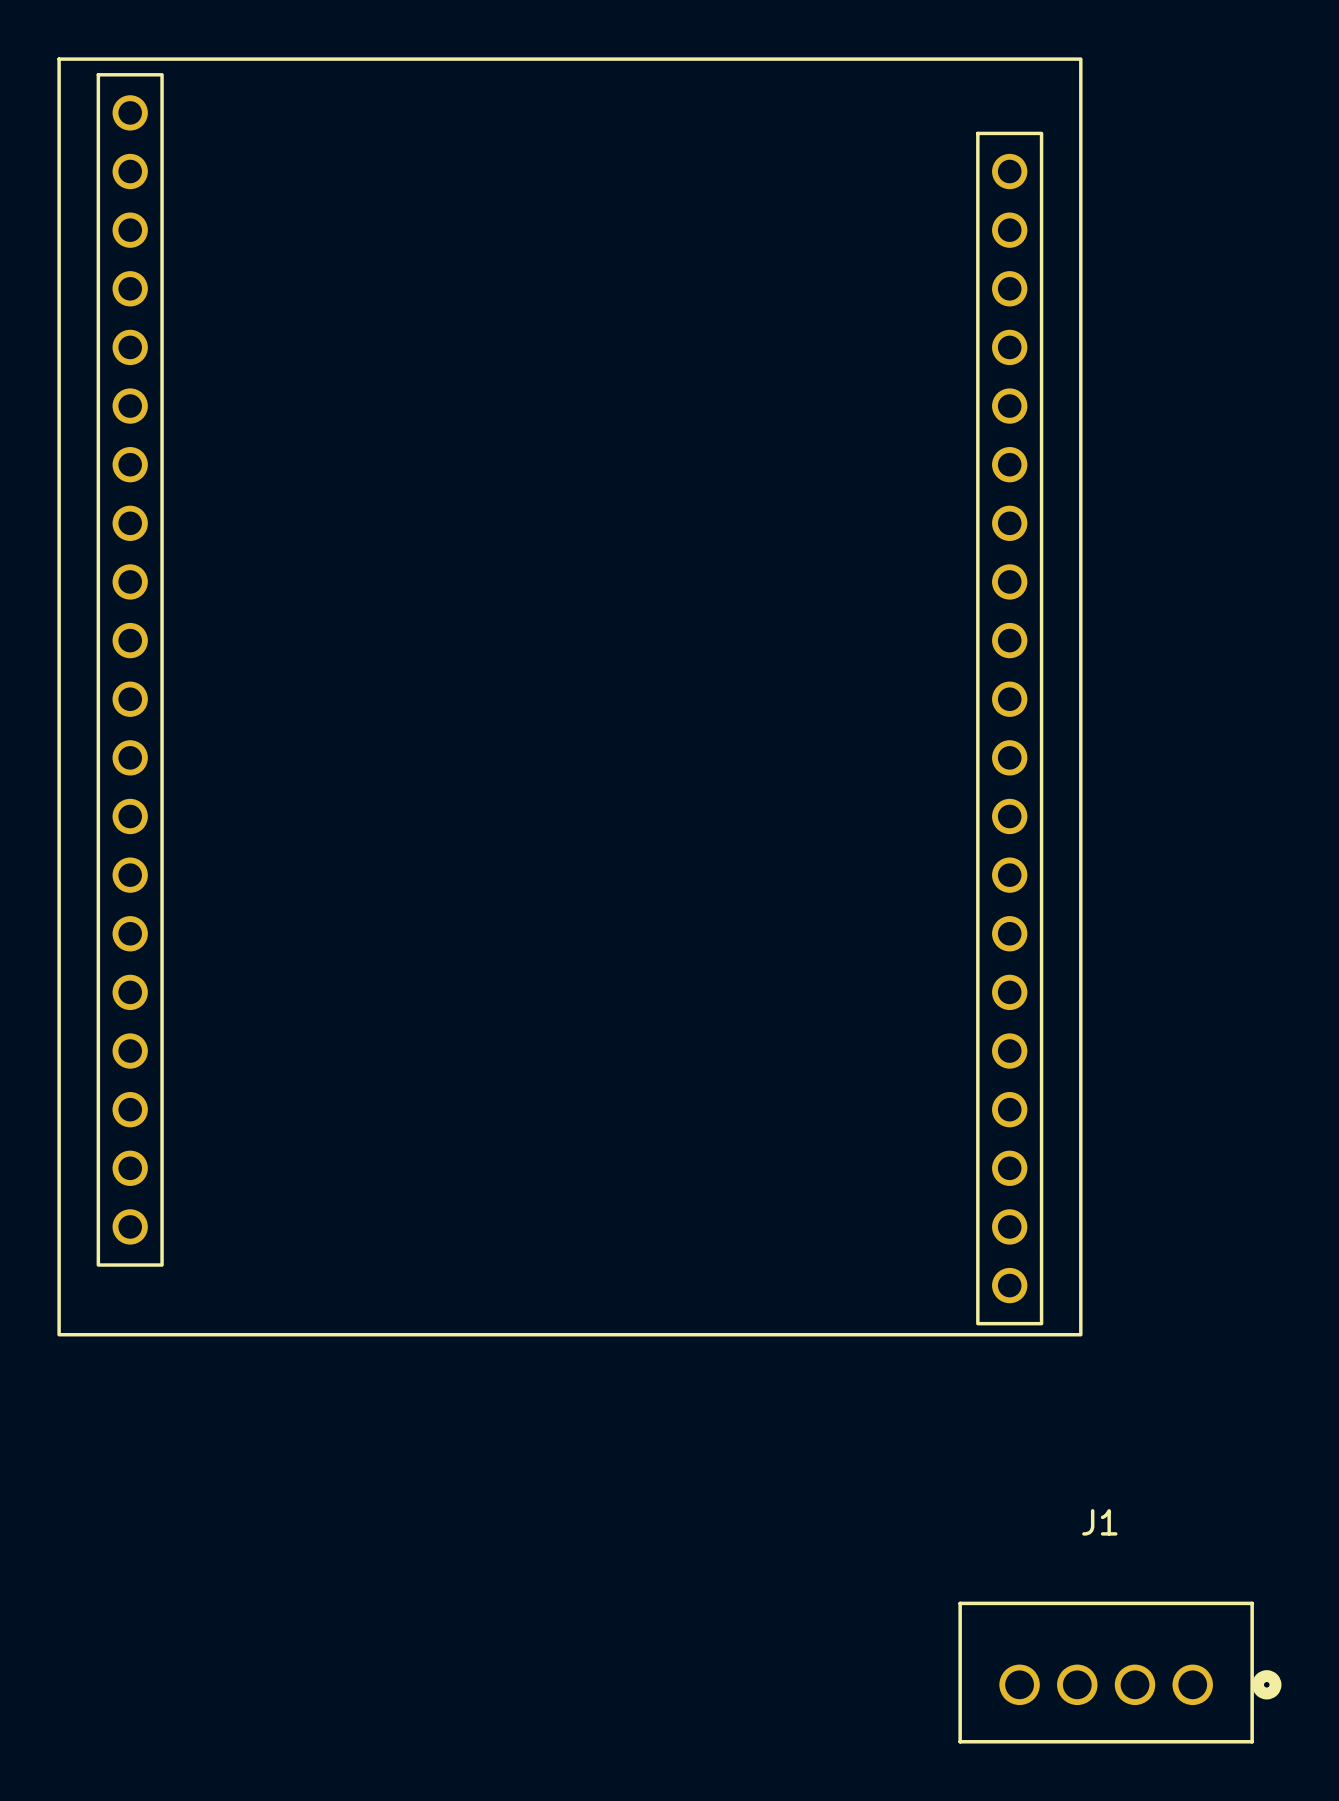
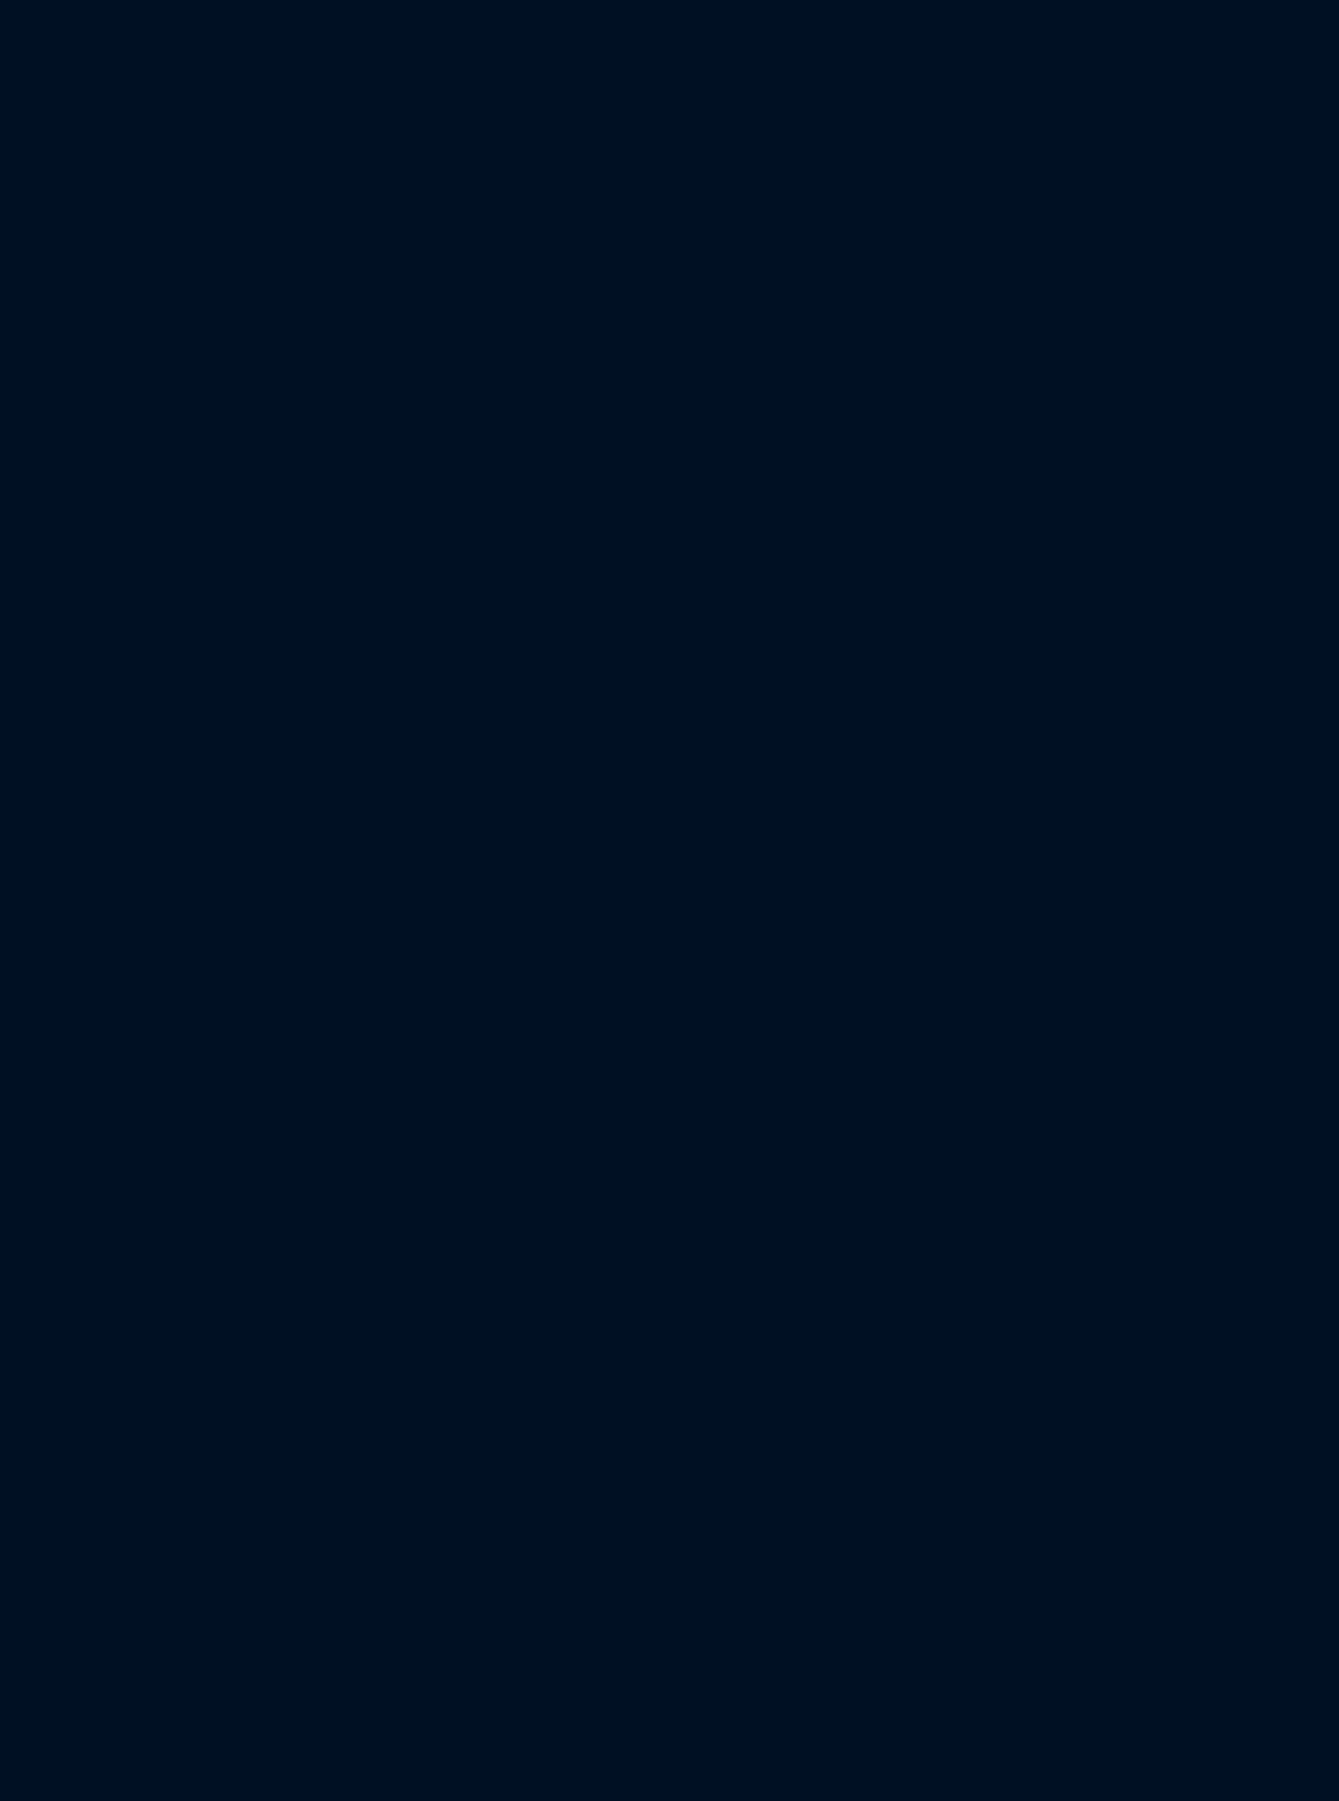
part: (569, 696) -> none
J1: (1119, 1672) -> none

